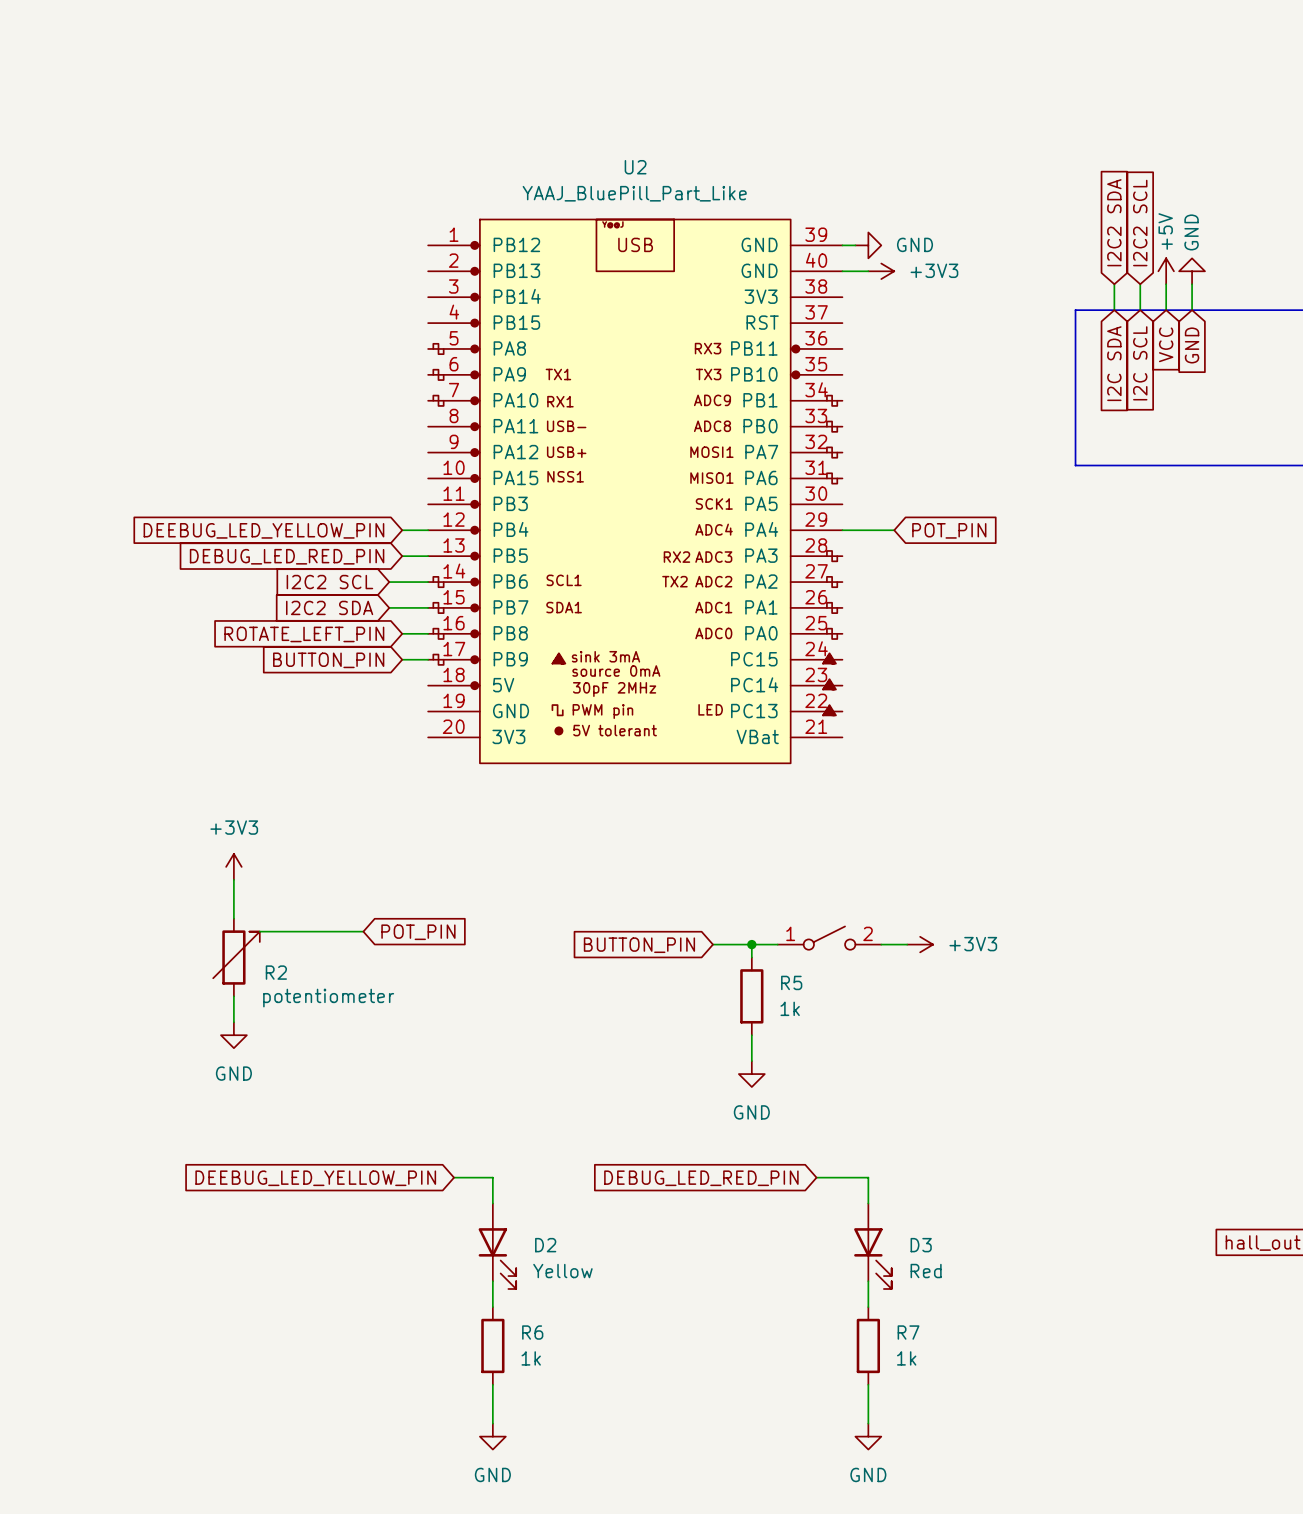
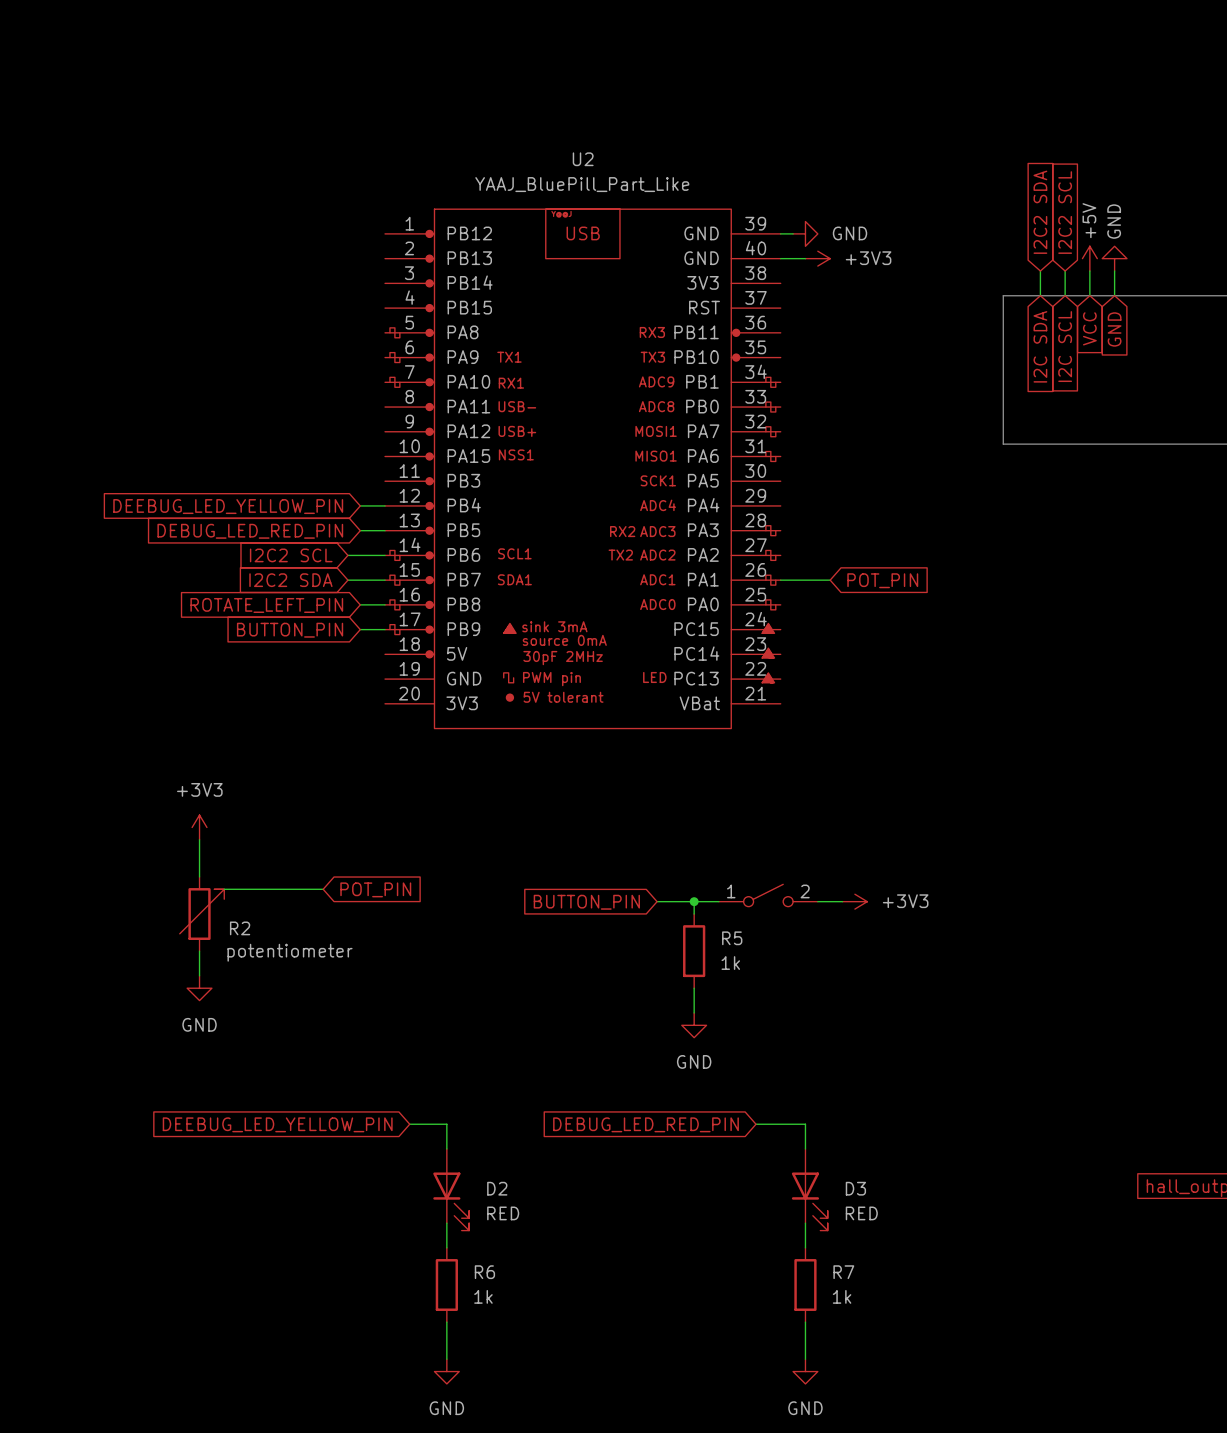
wire: (842, 530) (894, 530) -> (780, 580) (830, 580)
global label position: POT_PIN (949, 530) -> POT_PIN (882, 580)
D2 value: Yellow (562, 1271) -> RED (503, 1213)
D3 value: Red (926, 1271) -> RED (861, 1213)

